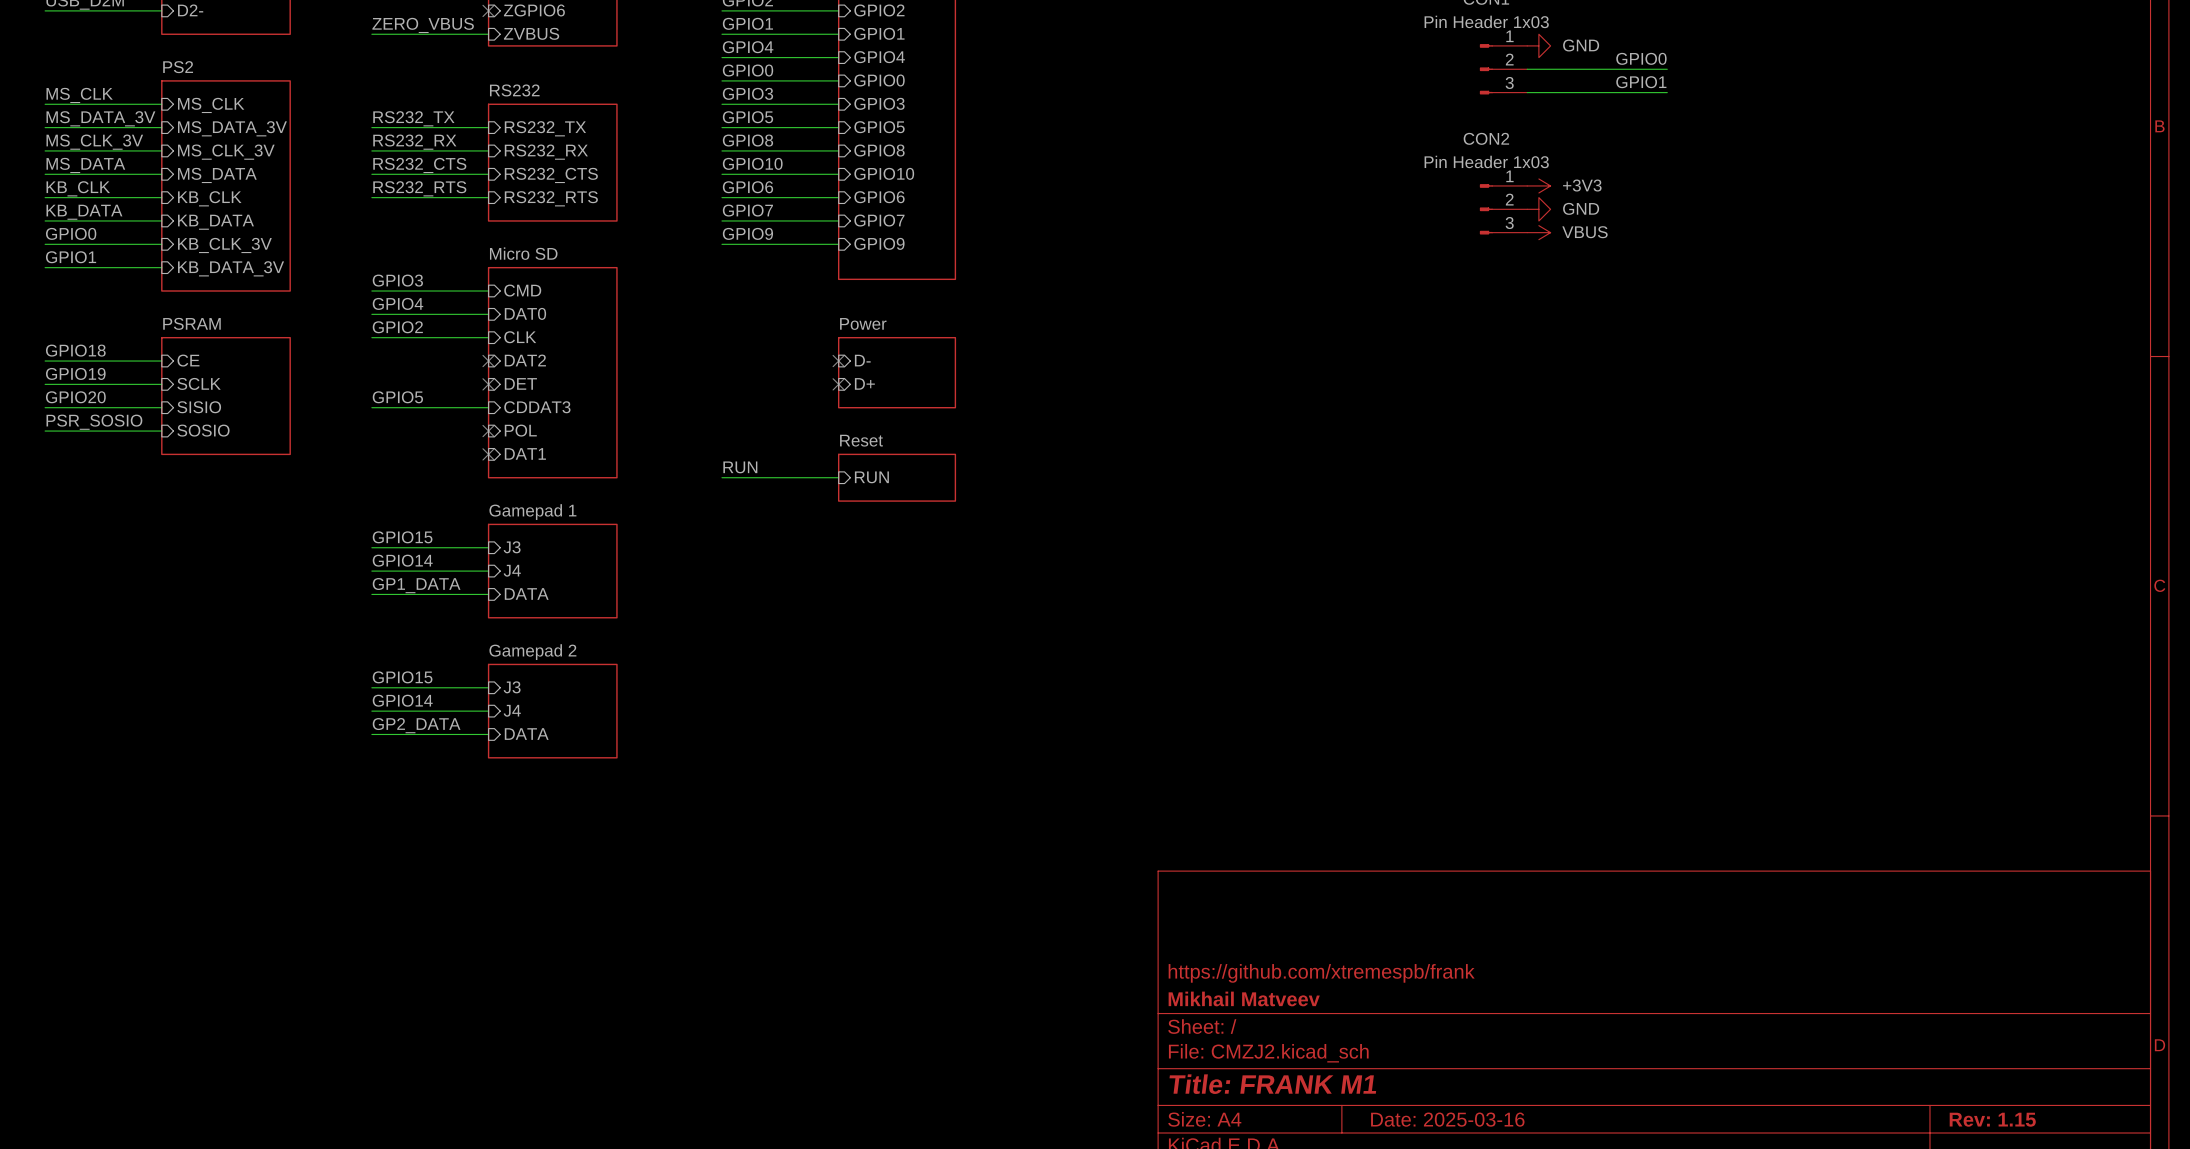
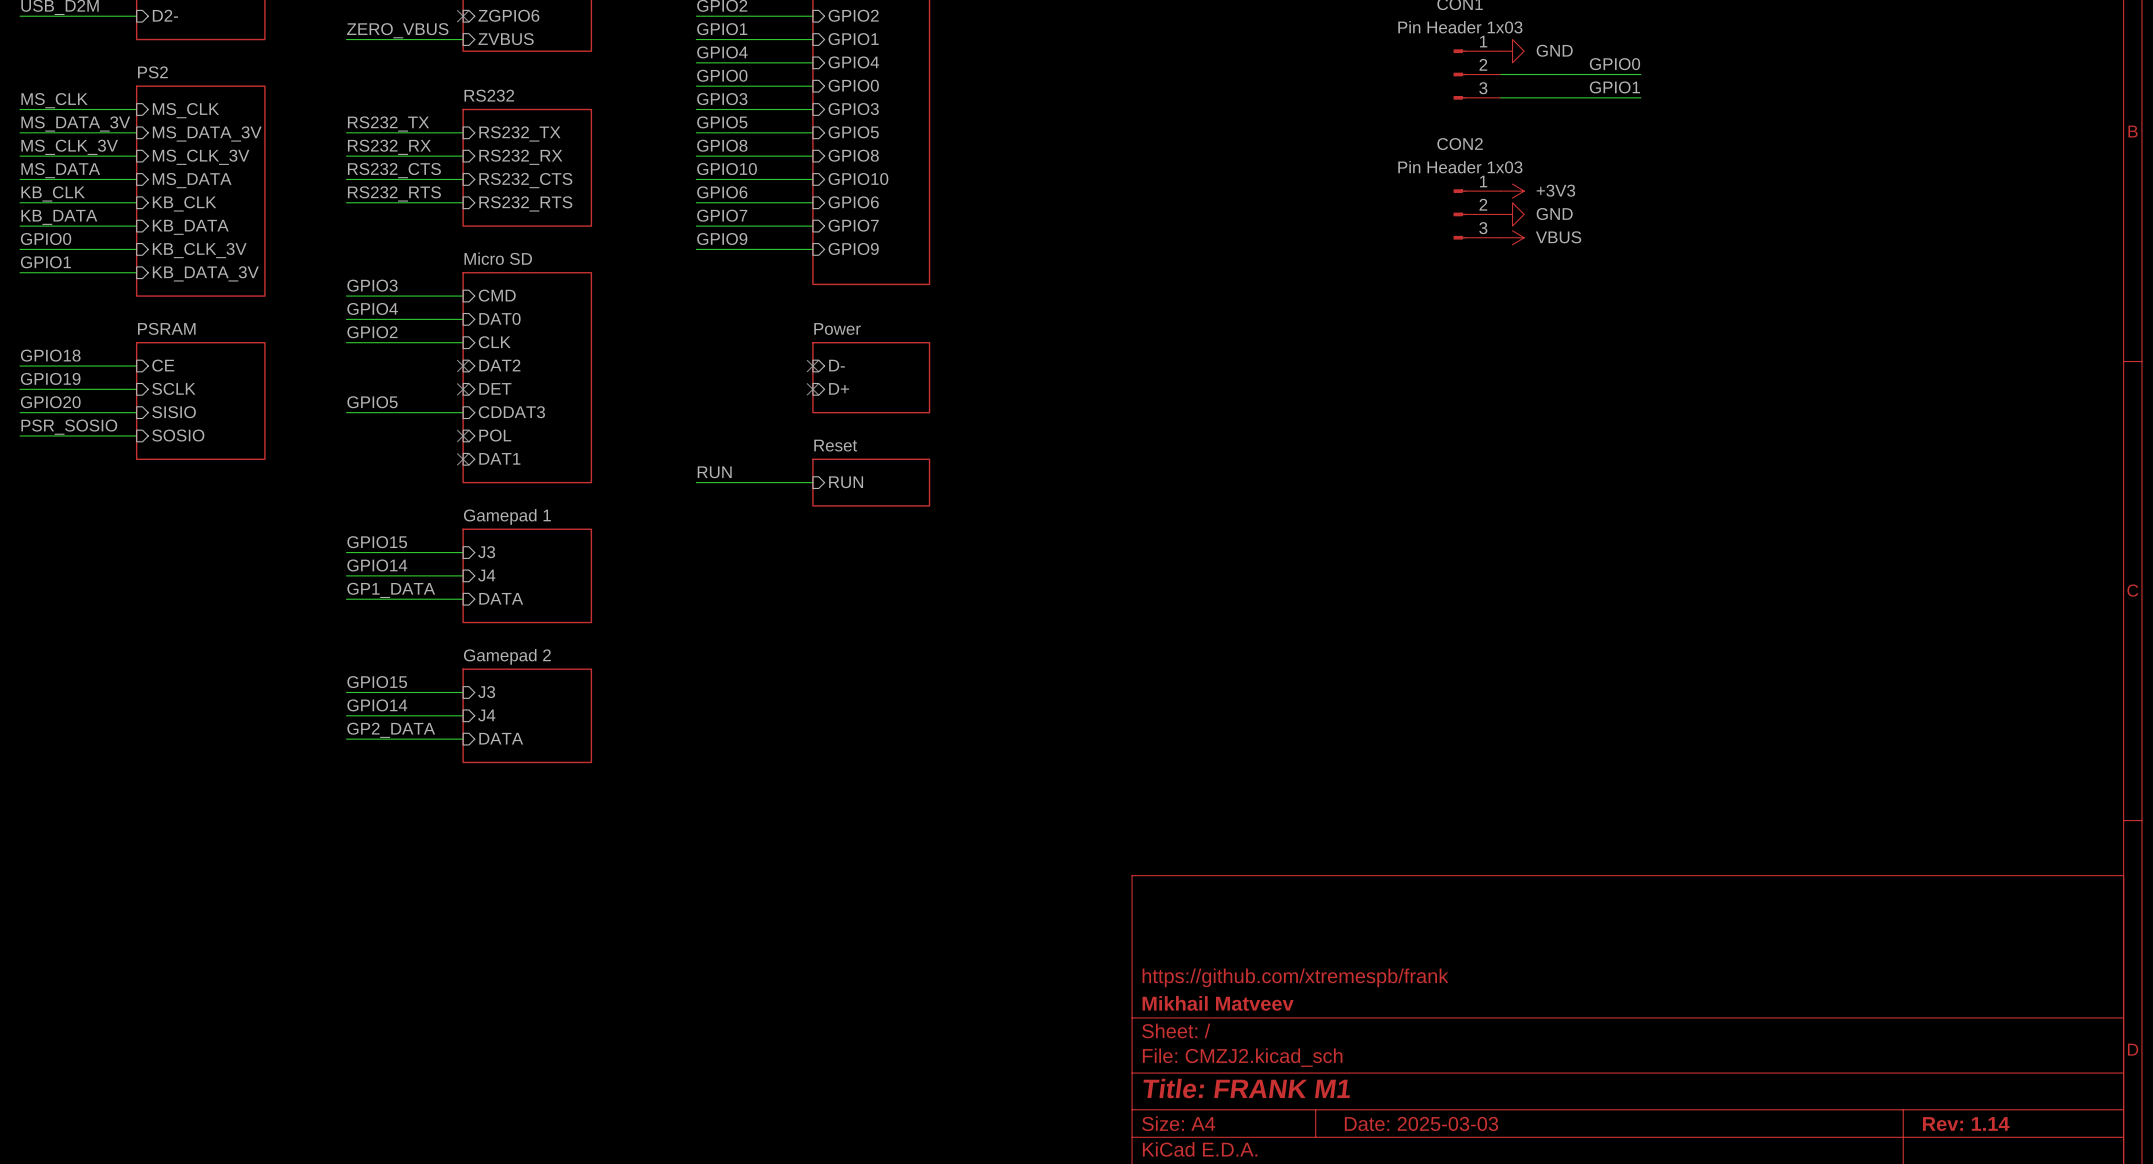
title block: Date: 2025-03-16 (1447, 1119) -> Date: 2025-03-03 (1421, 1123)
title block: Rev: 1.15 (1992, 1119) -> Rev: 1.14 (1966, 1124)

